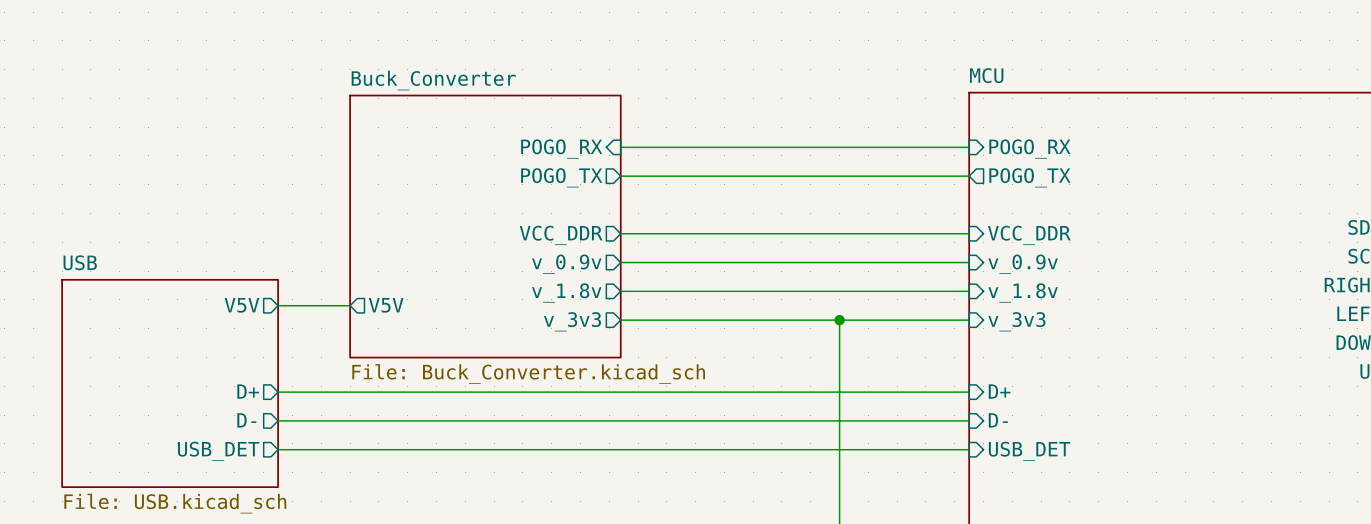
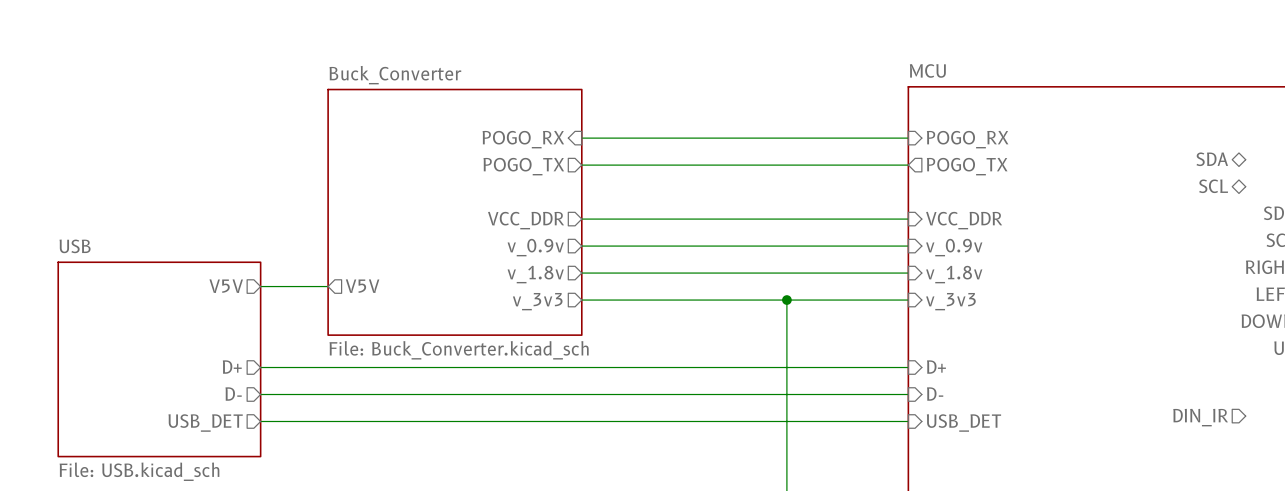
sheet pin: none -> SDA (1212, 159)
sheet pin: none -> SCL (1213, 186)
sheet pin: none -> DIN_IR (1200, 417)

